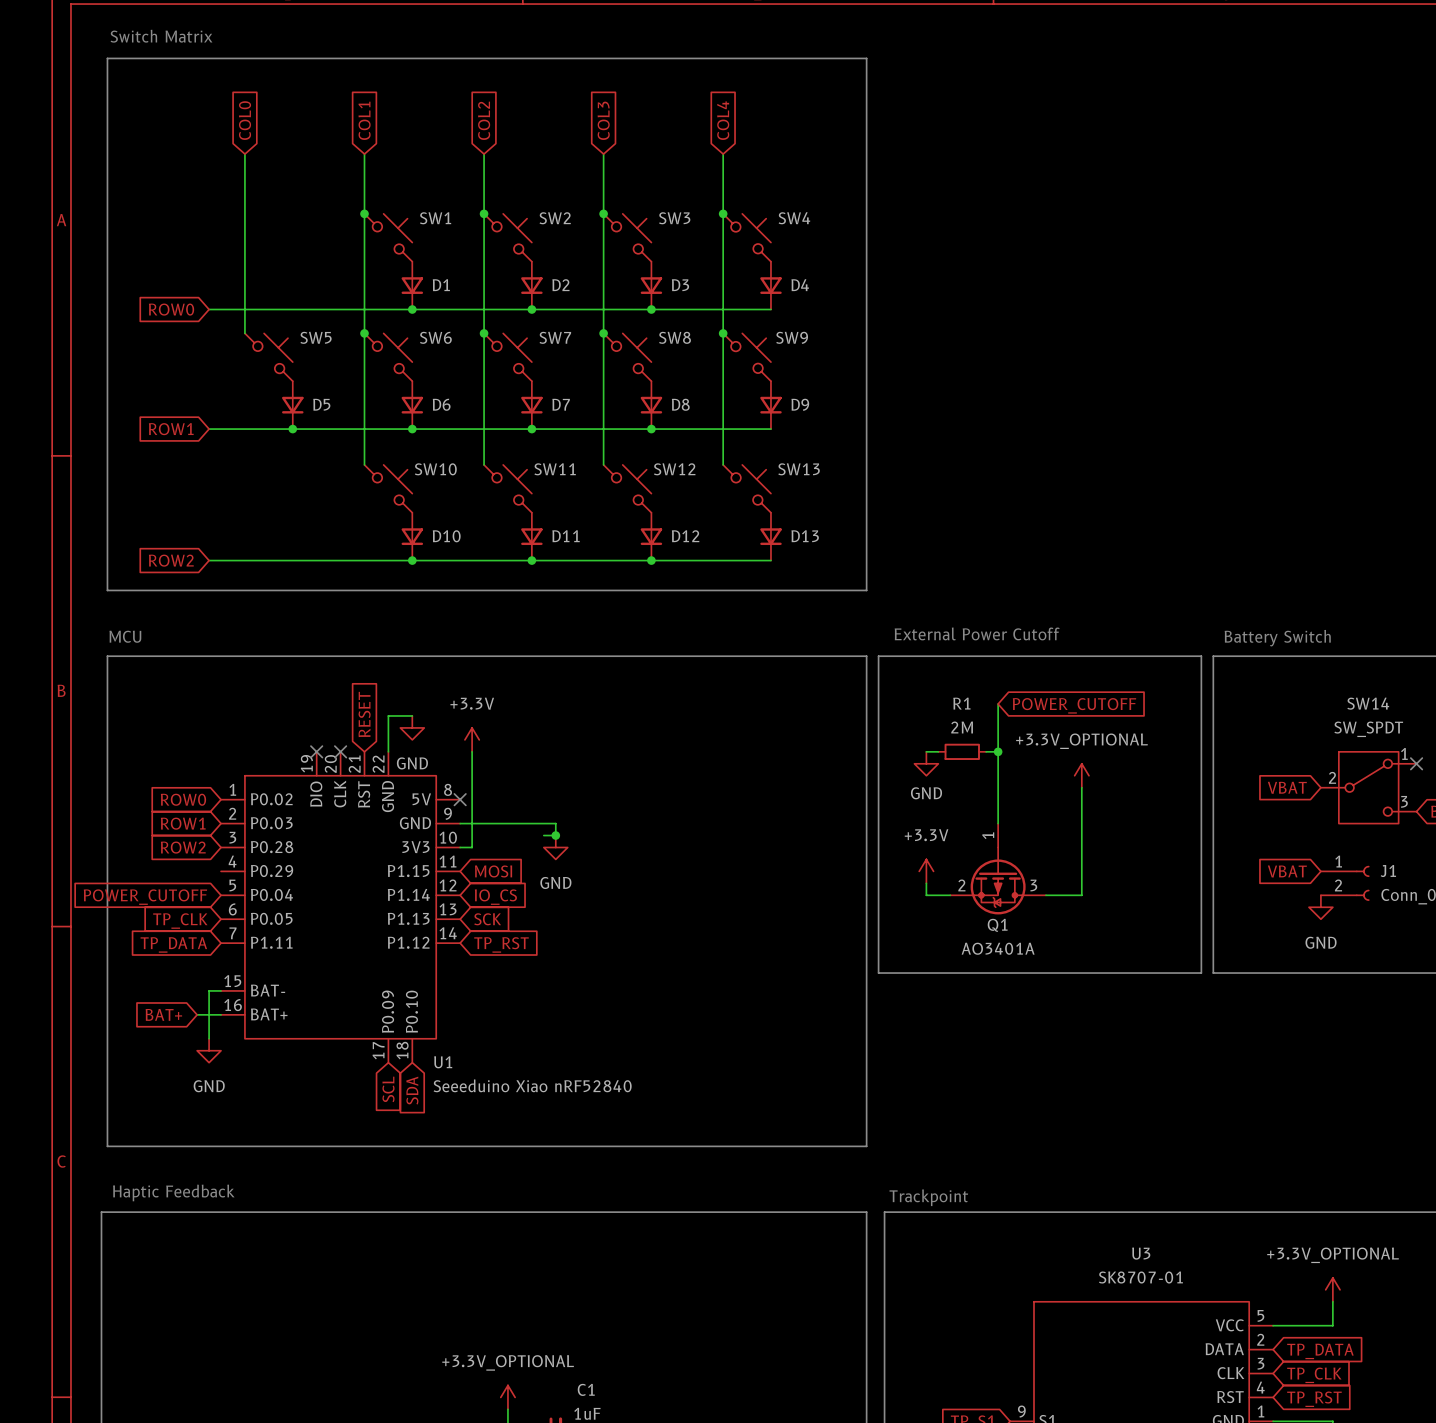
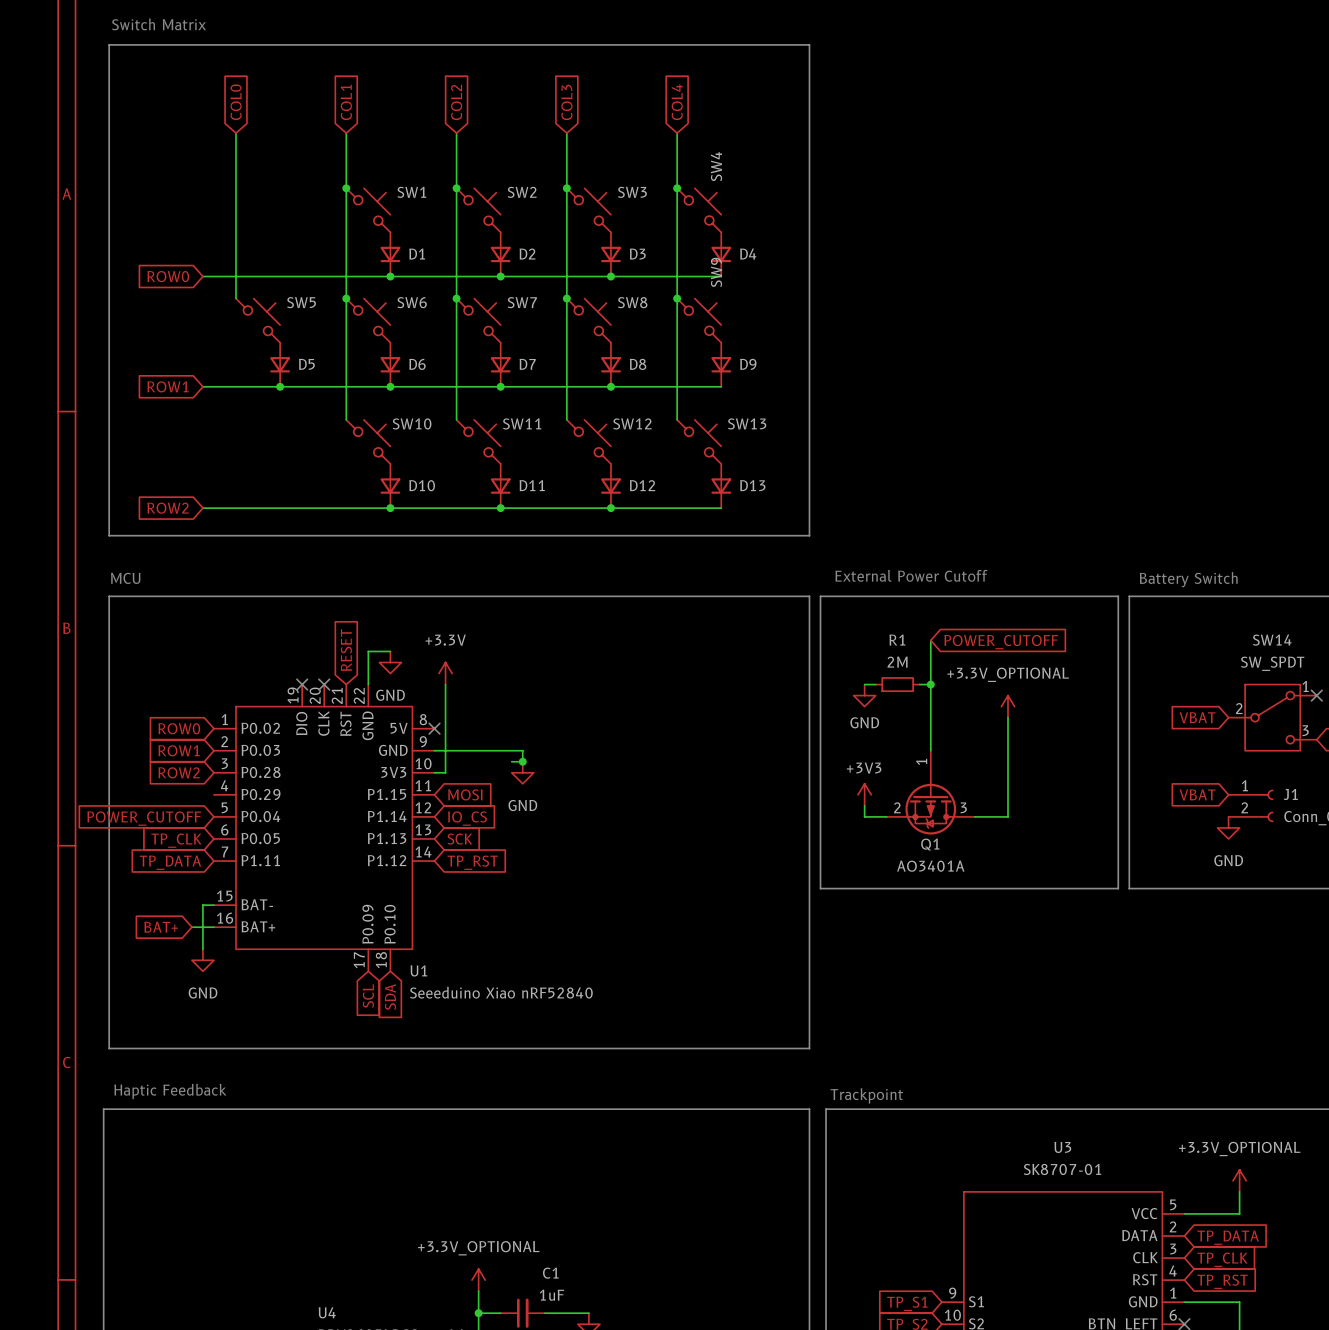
SW4 name rotation: 0° (794, 218) -> 90° counterclockwise (716, 166)
SW9 name rotation: 0° (792, 337) -> 90° counterclockwise (716, 272)
power symbol: +3.3V (926, 871) -> +3V3 (864, 794)

